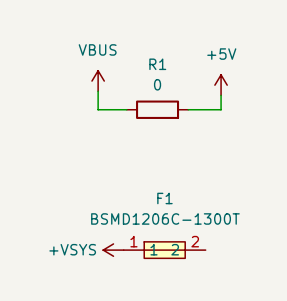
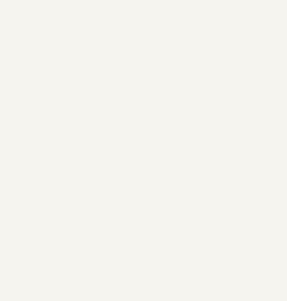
power symbol: VBUS (98, 81) -> none
power symbol: +5V (221, 85) -> none
wire: (98, 91) (98, 109) (126, 109) -> none
wire: (221, 95) (221, 109) (188, 109) -> none
R1: 0 (157, 109) -> none
power symbol: +VSYS (113, 250) -> none
F1: BSMD1206C-1300T (164, 250) -> none

